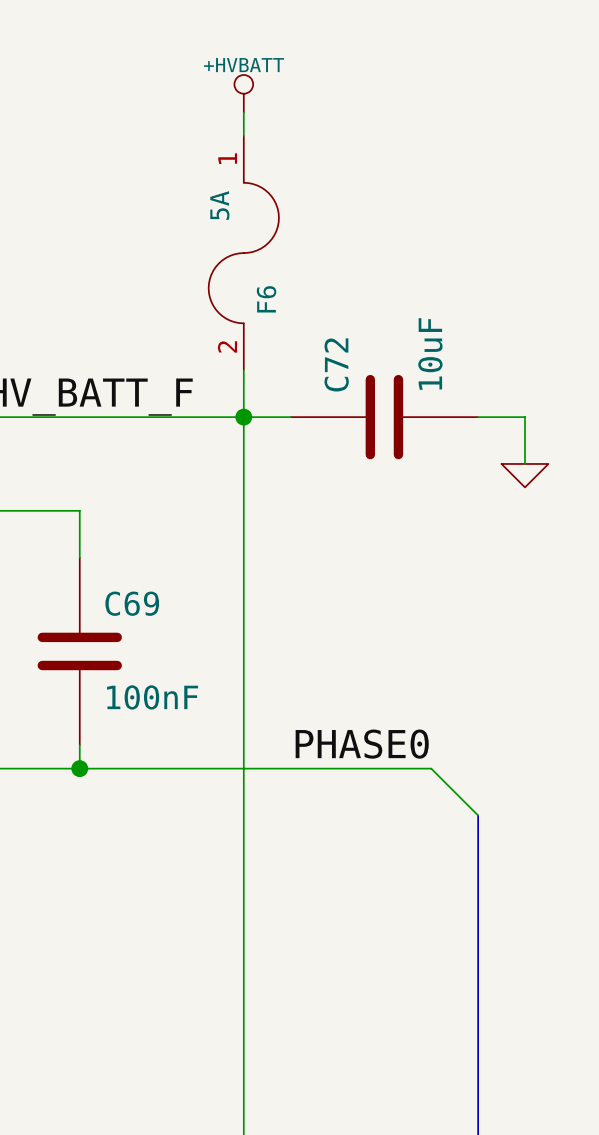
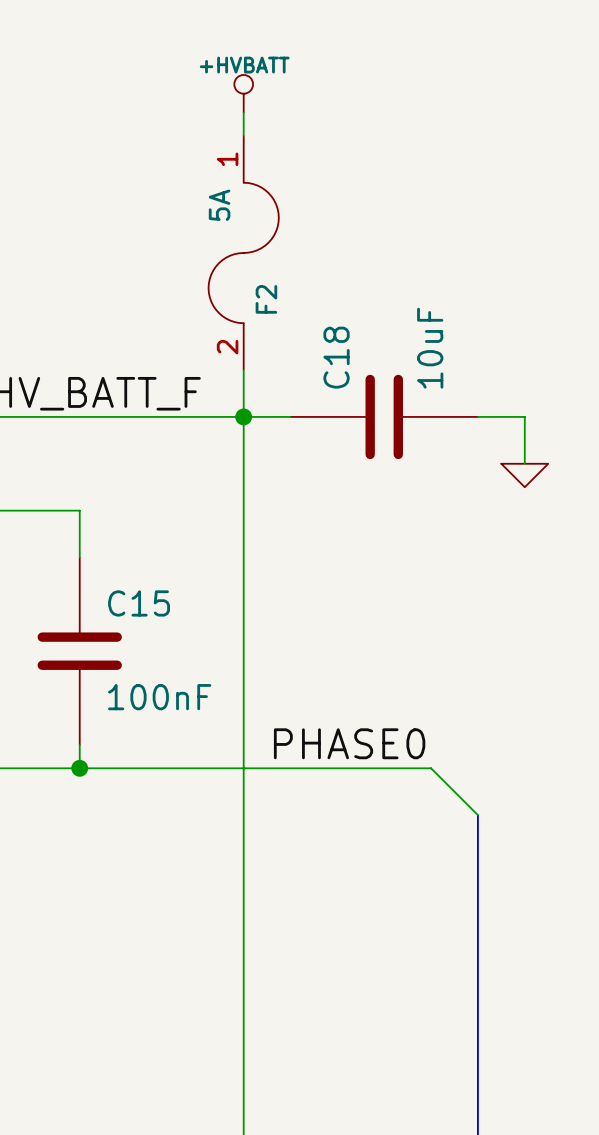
F6 name: F6 (266, 299) -> F2 (266, 299)
C72 name: C72 (336, 364) -> C18 (336, 357)
C69 name: C69 (132, 603) -> C15 (139, 603)

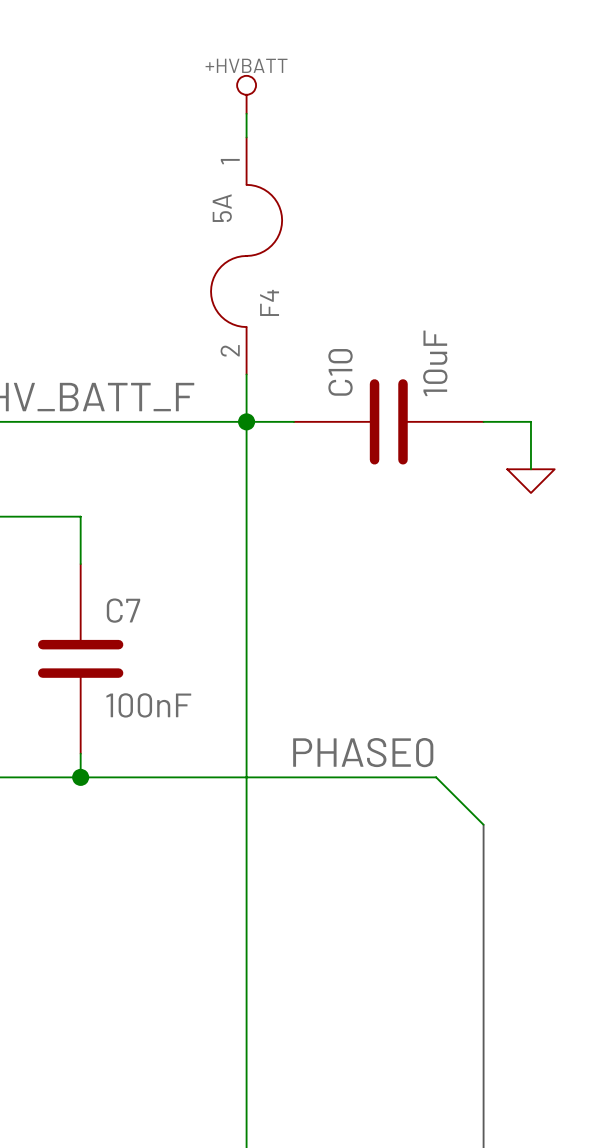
F2 name: F2 (266, 299) -> F4 (269, 302)
C18 name: C18 (336, 357) -> C10 (340, 372)
C15 name: C15 (139, 603) -> C7 (123, 610)

